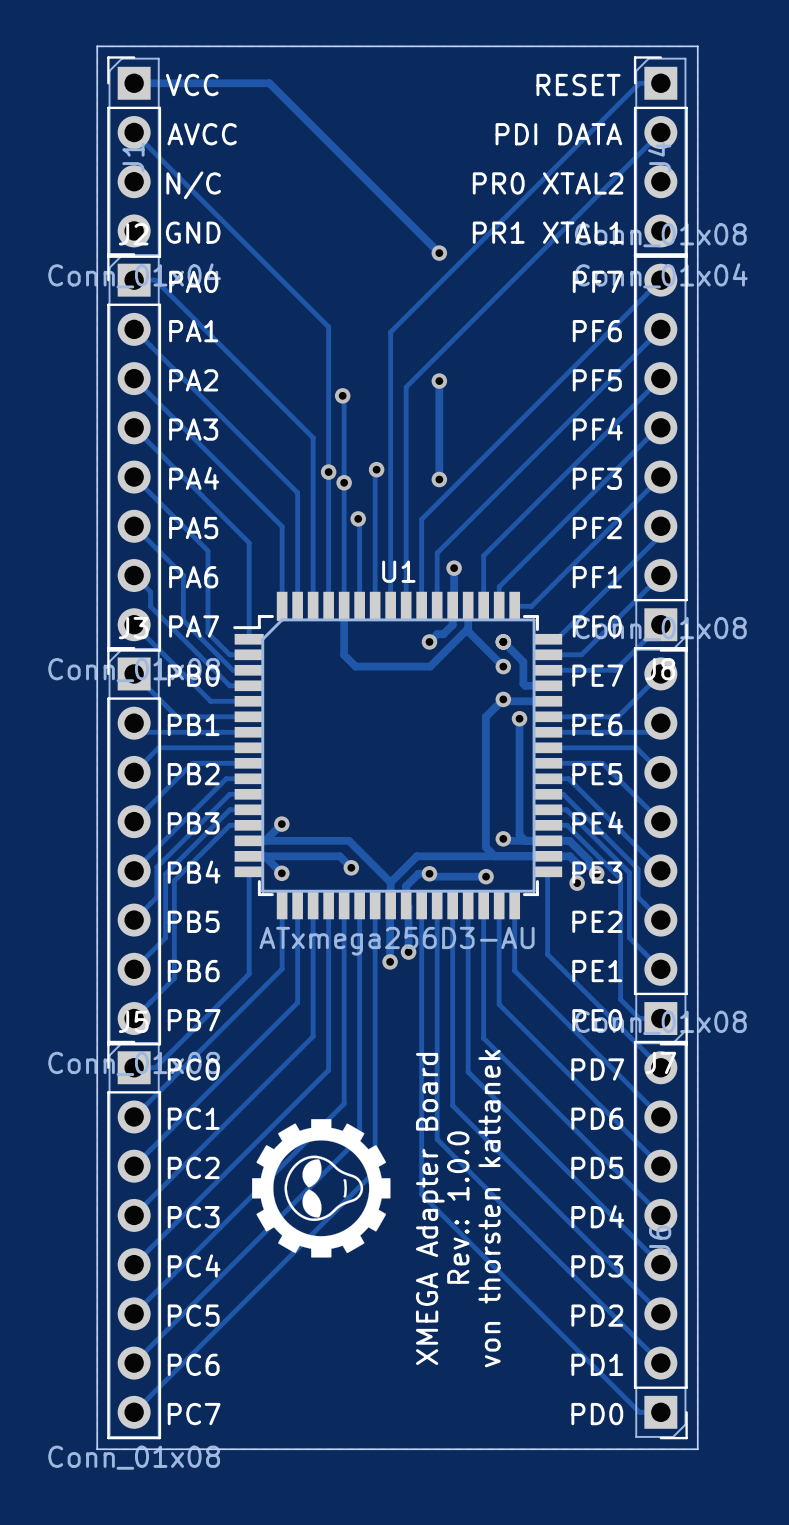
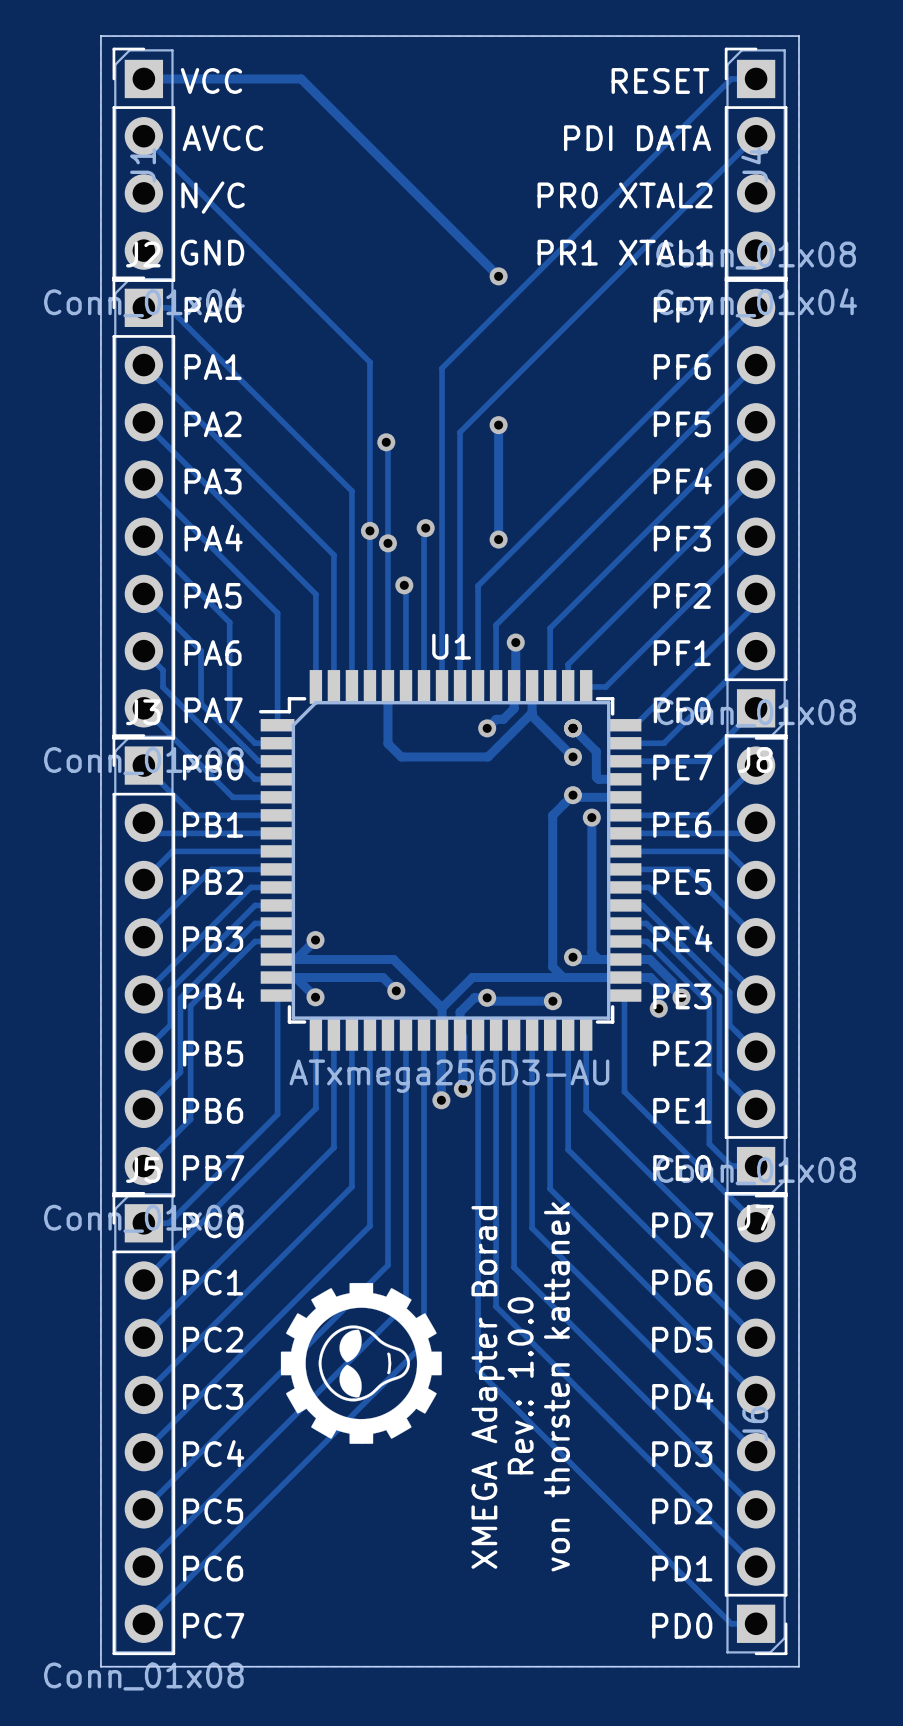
text: XMEGA Adapter Board (430, 1208) -> XMEGA Adapter Borad (488, 1387)

